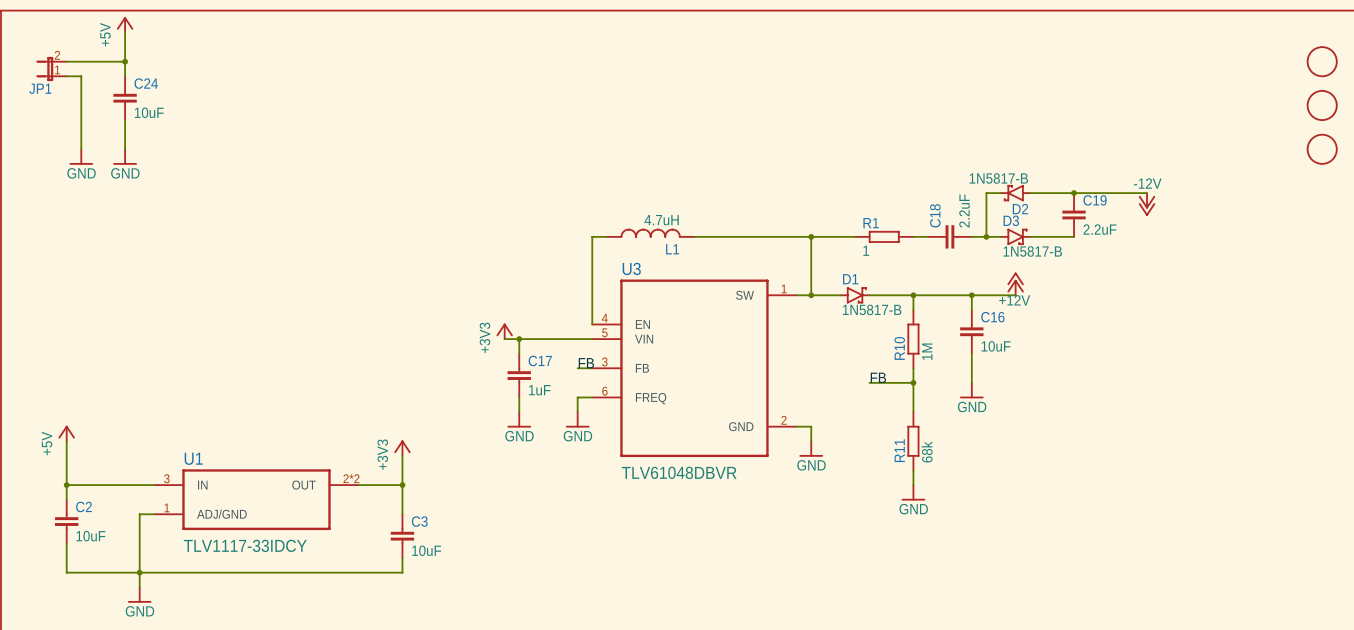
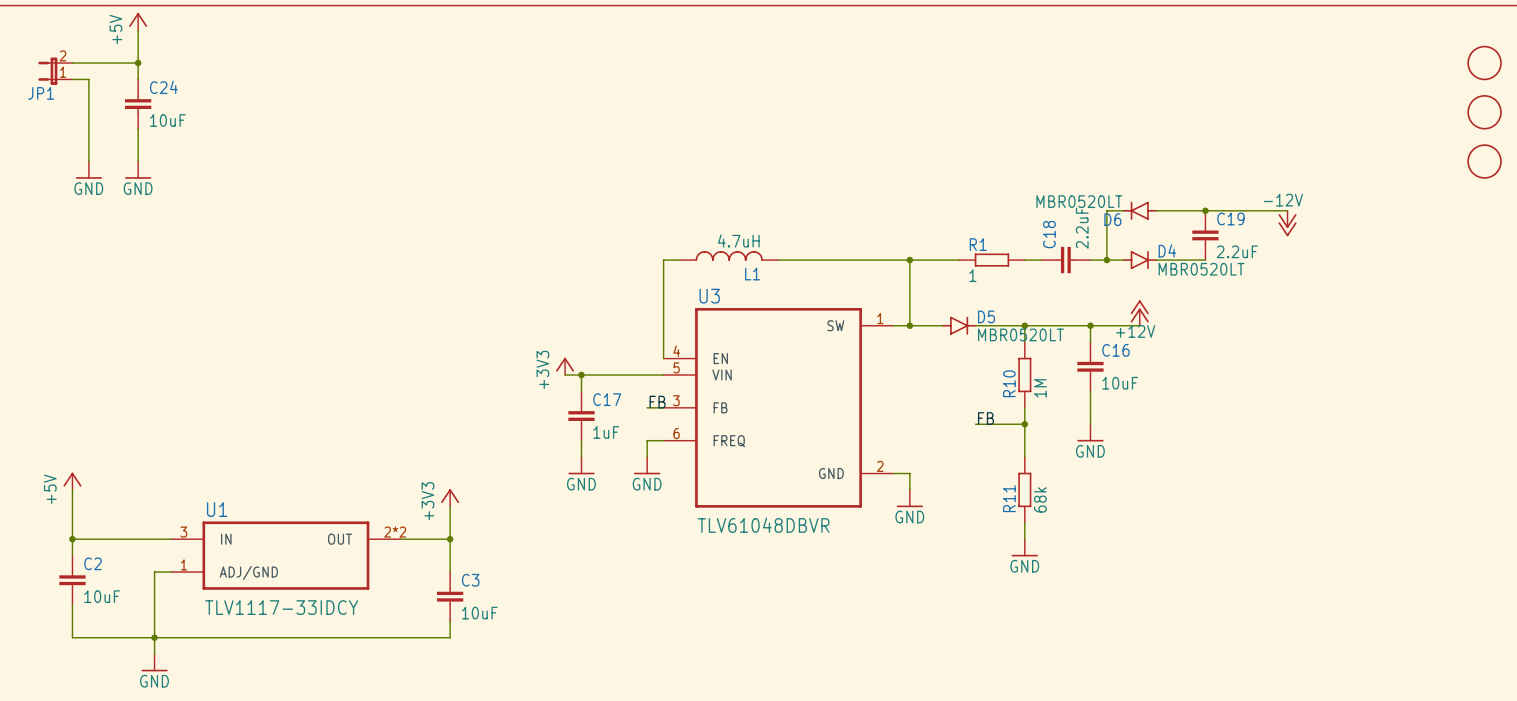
D2: 1N5817-B (1015, 193) -> none
D6: none -> MBR0520LT (1139, 210)
D3: 1N5817-B (1015, 236) -> none
D4: none -> MBR0520LT (1139, 260)
D1: 1N5817-B (855, 295) -> none
D5: none -> MBR0520LT (959, 325)

